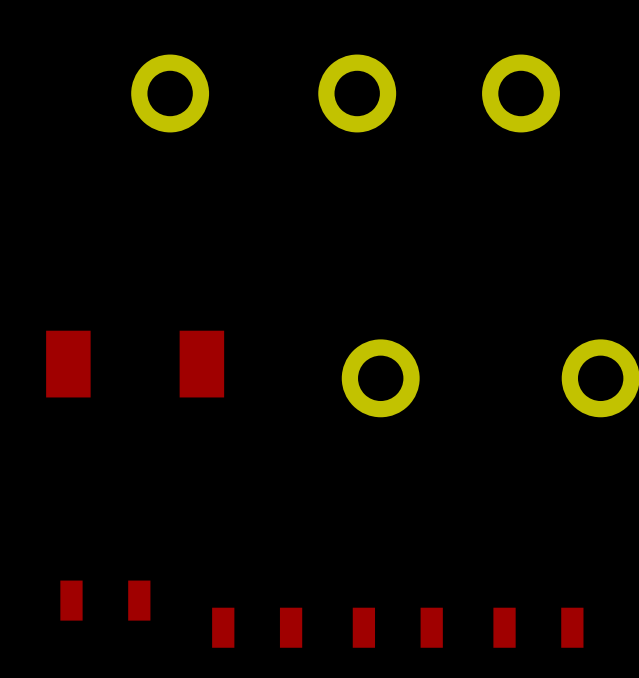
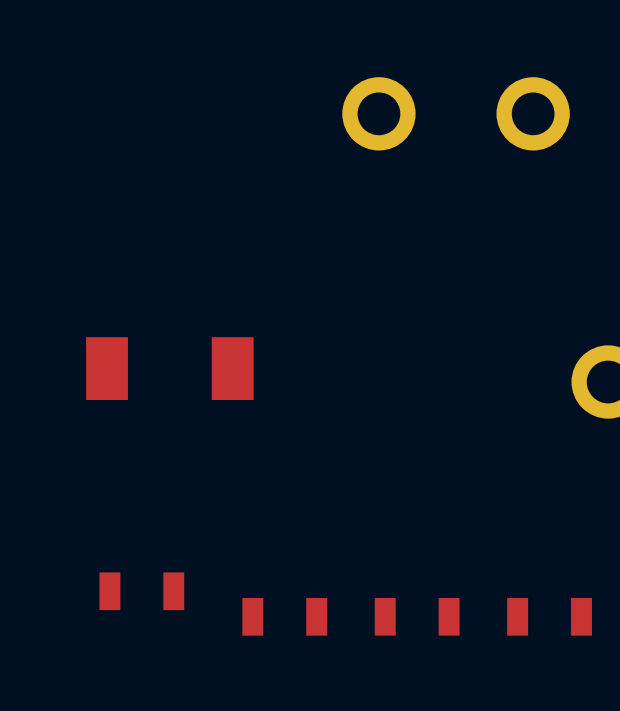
part: (170, 93) -> none
part: (380, 378) -> none

